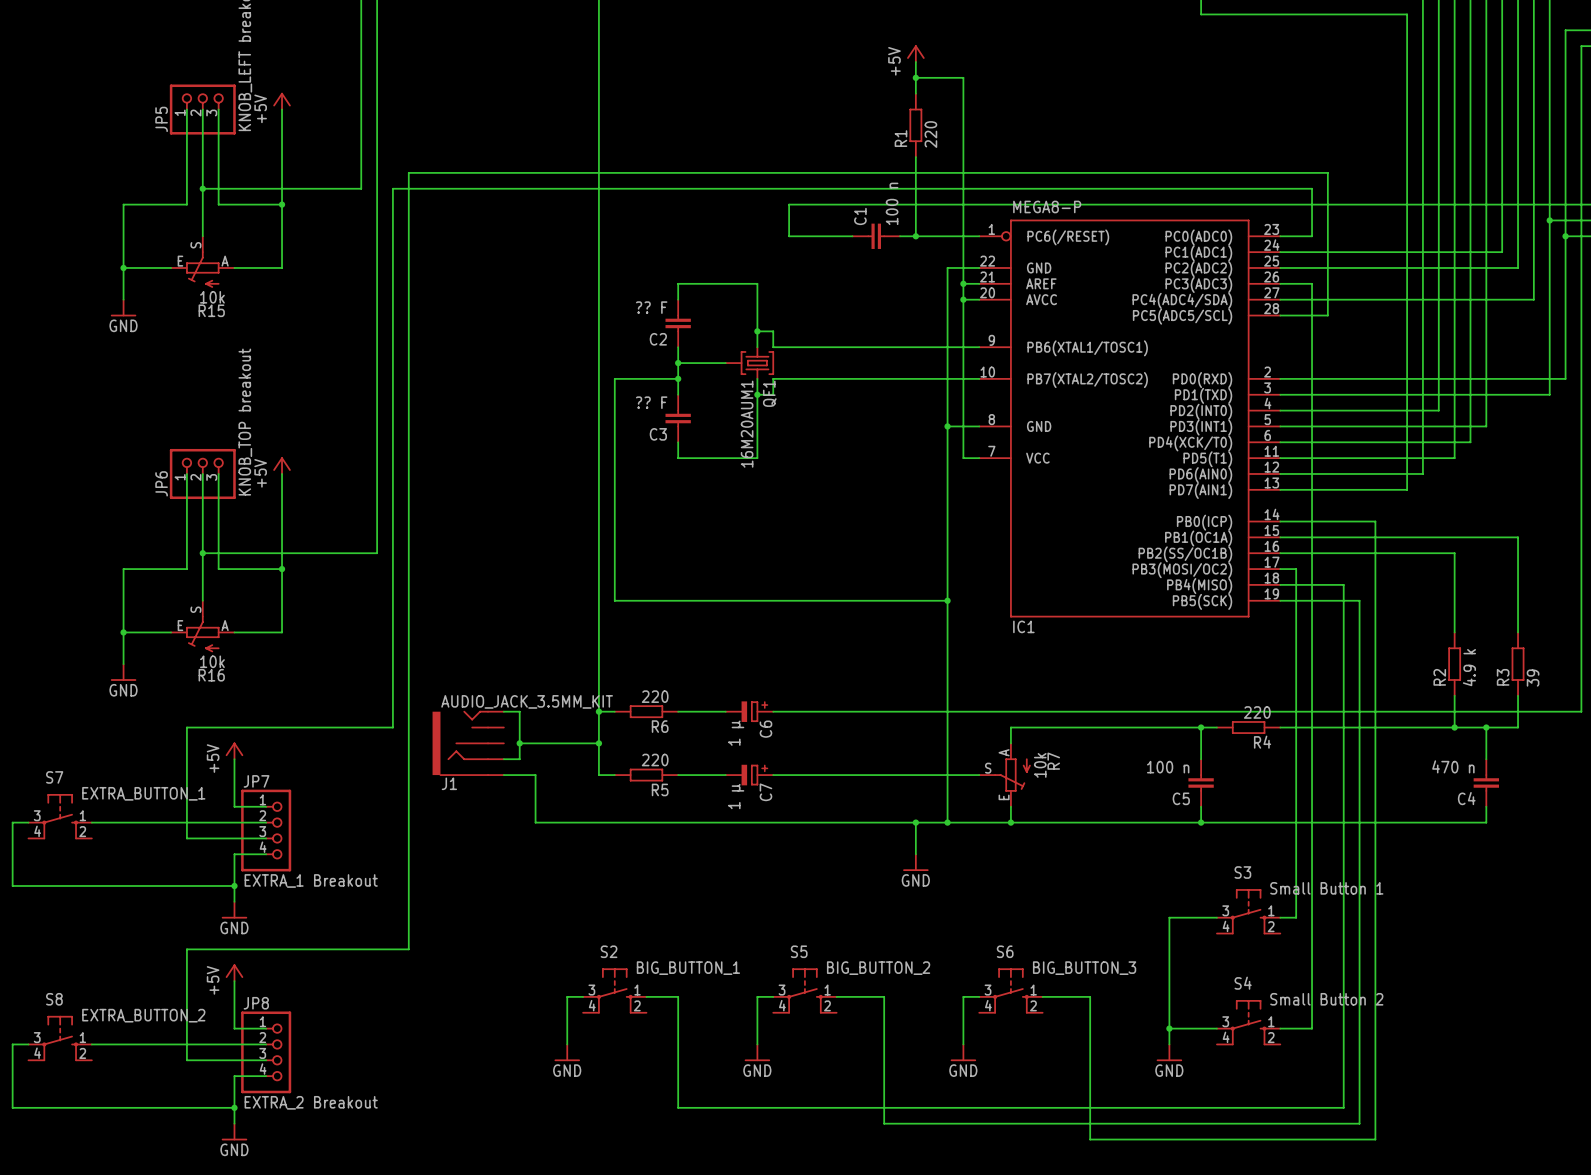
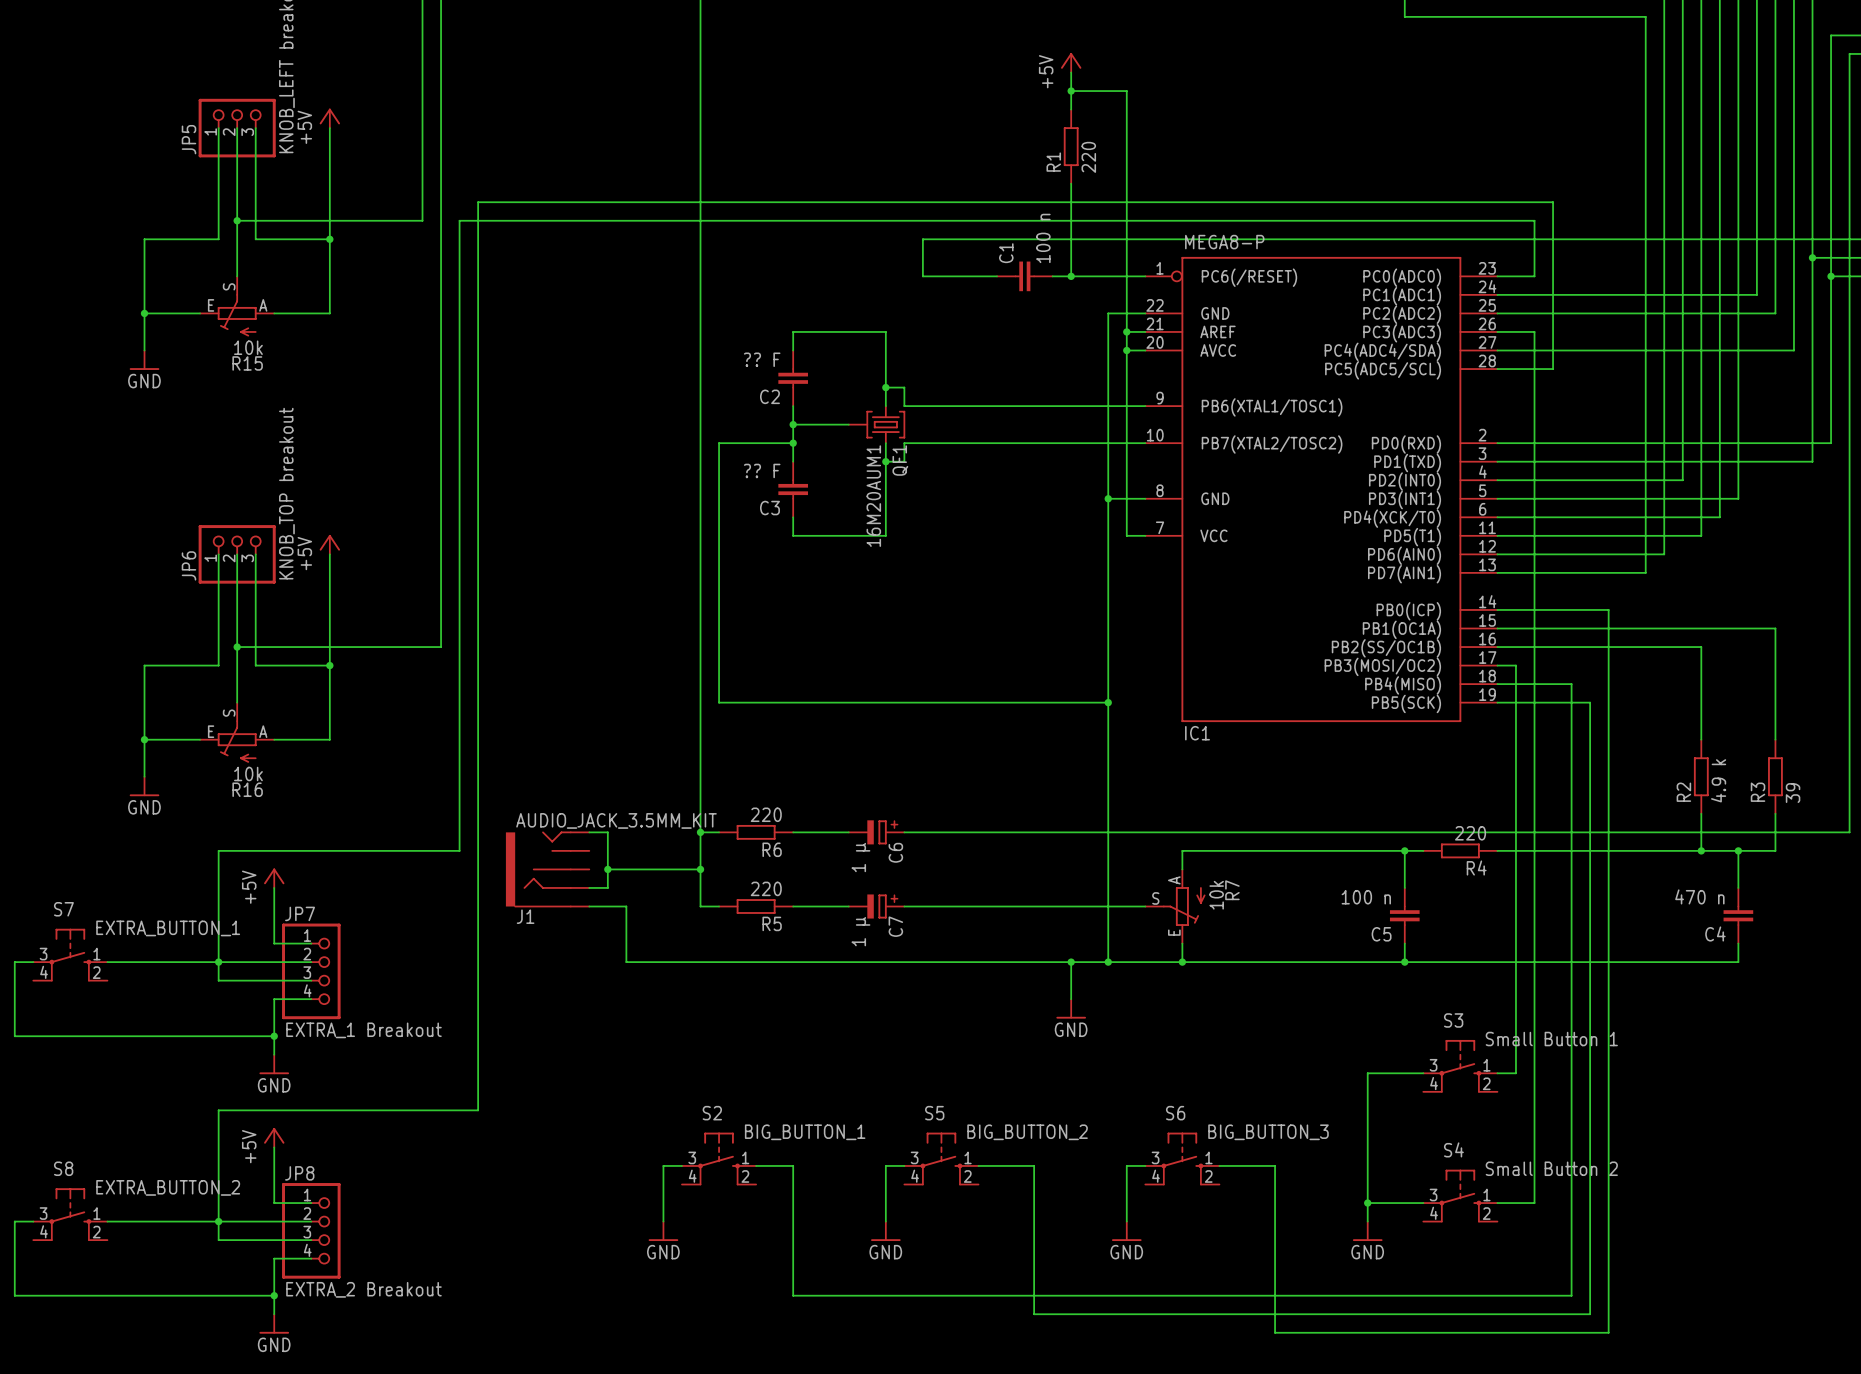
junction: none -> (218, 962)
junction: none -> (218, 1221)

